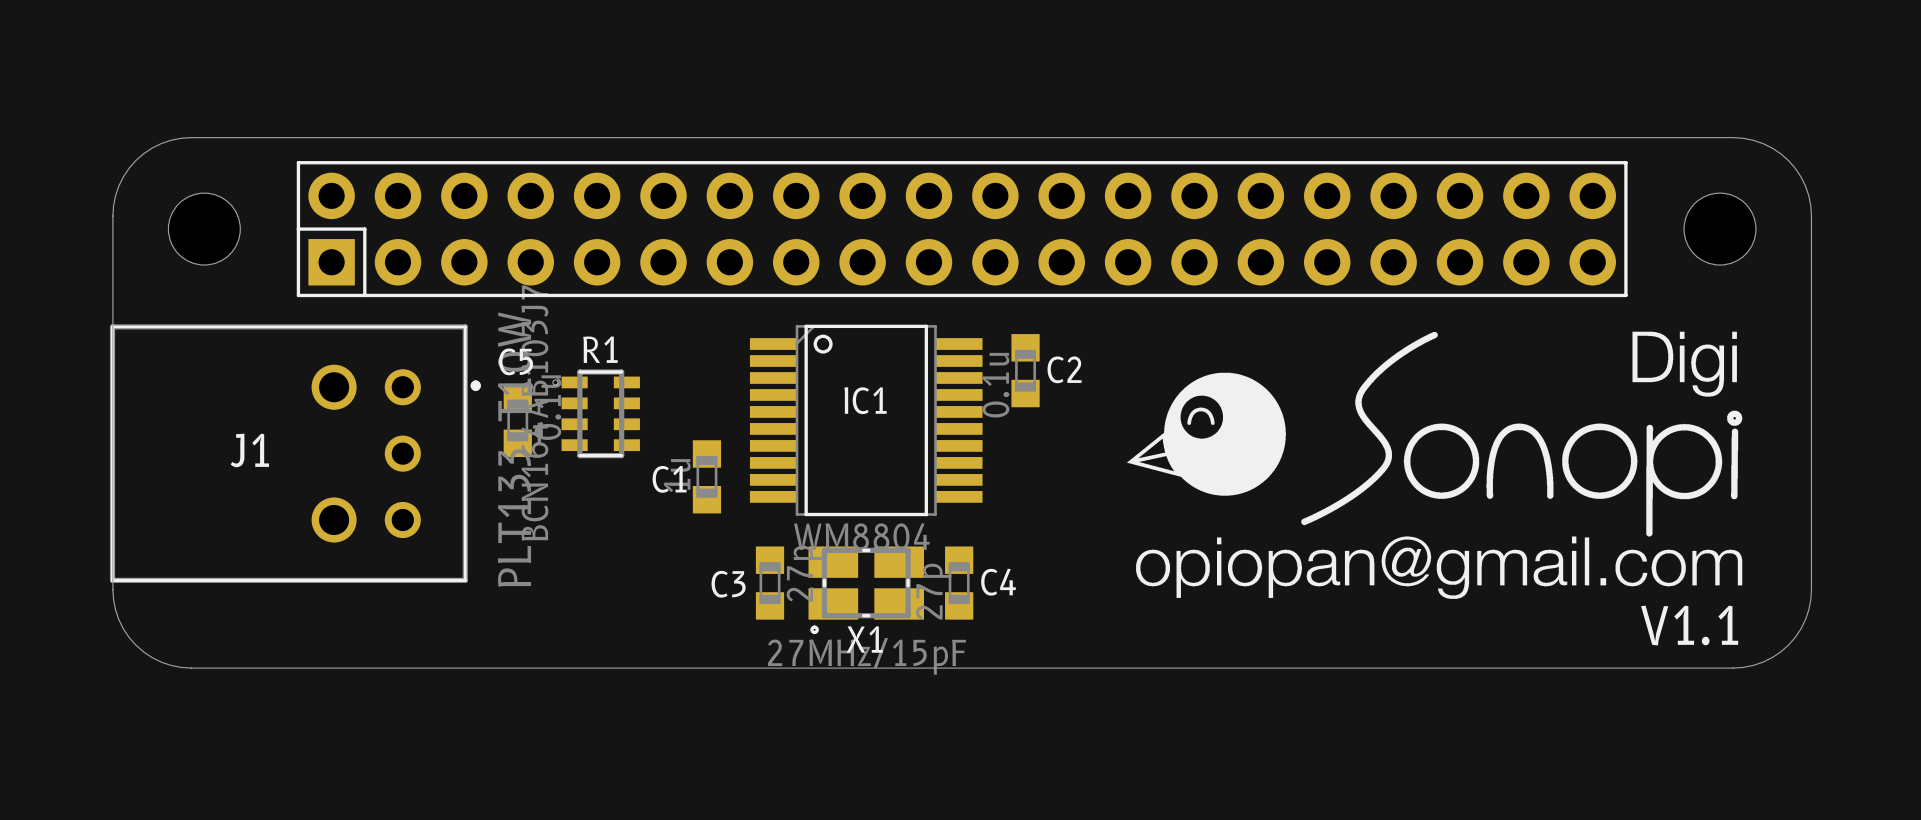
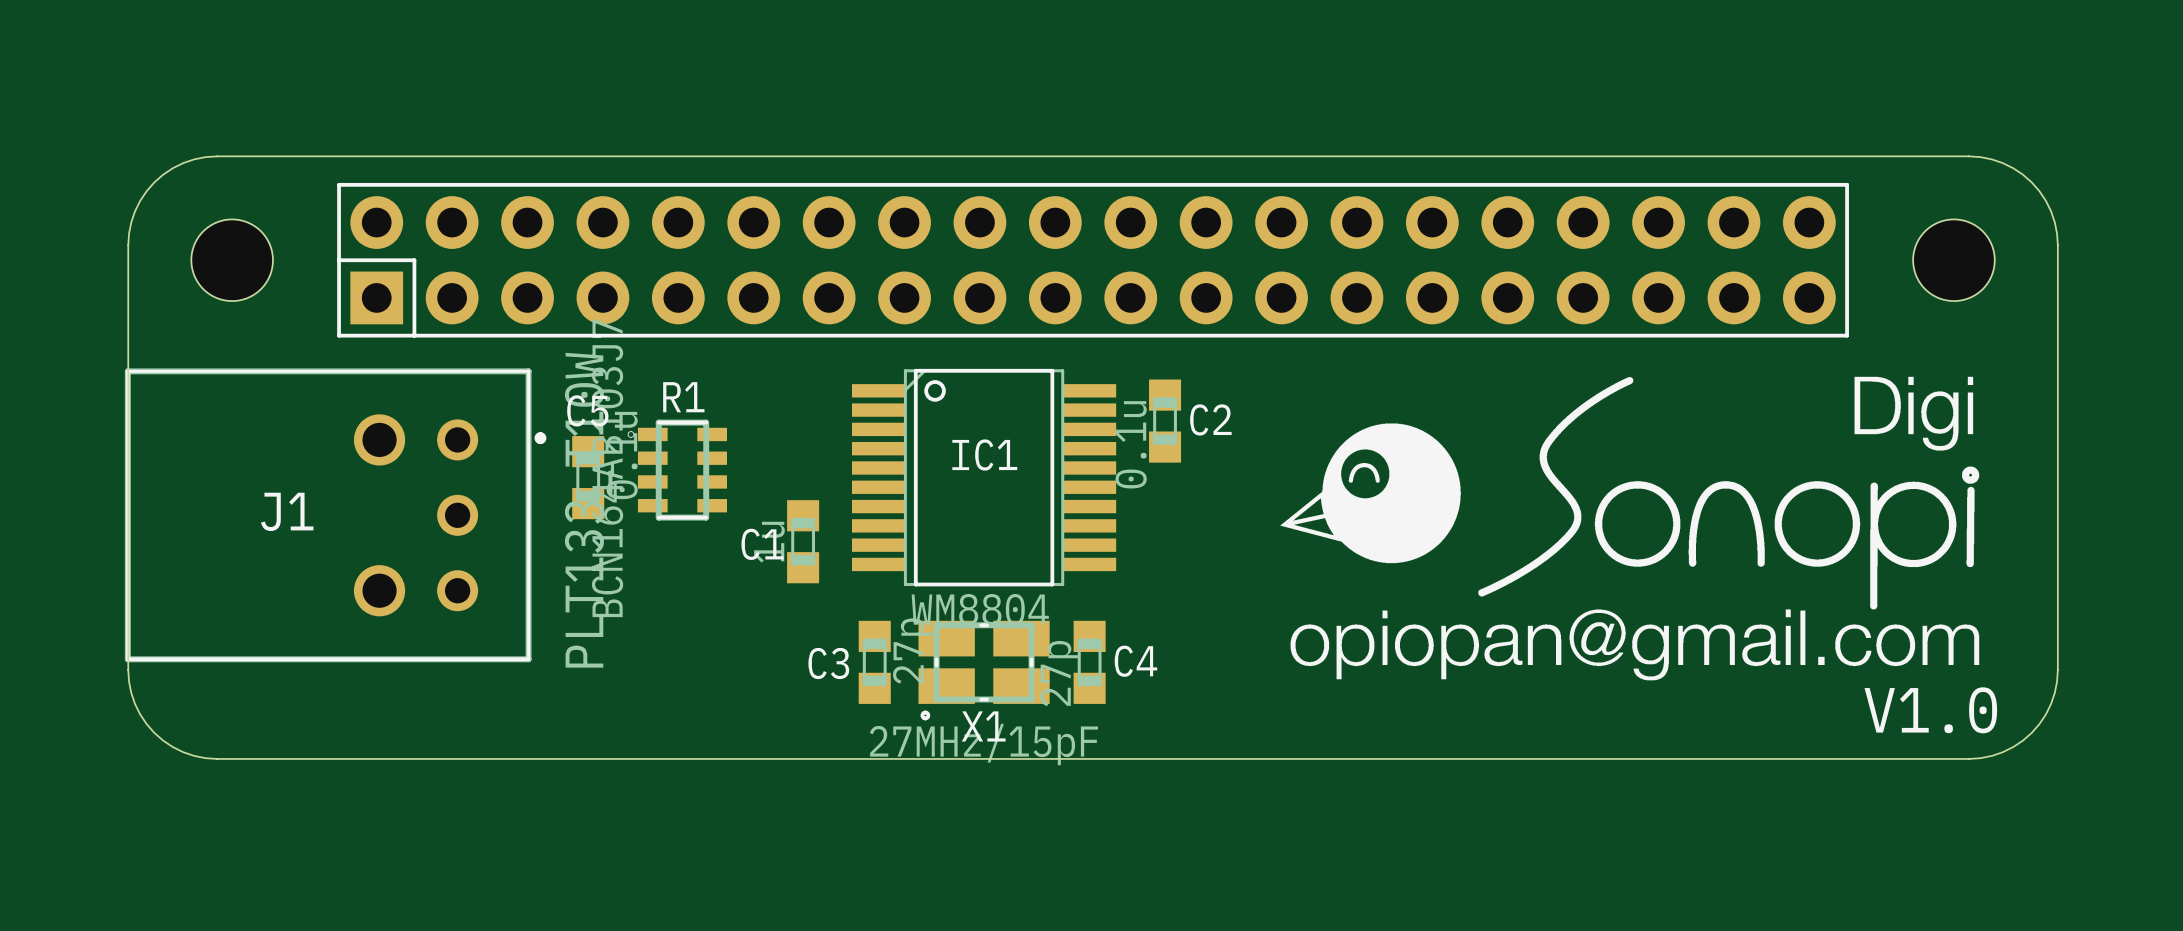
text: V1.1 (1689, 625) -> V1.0 (1930, 710)

